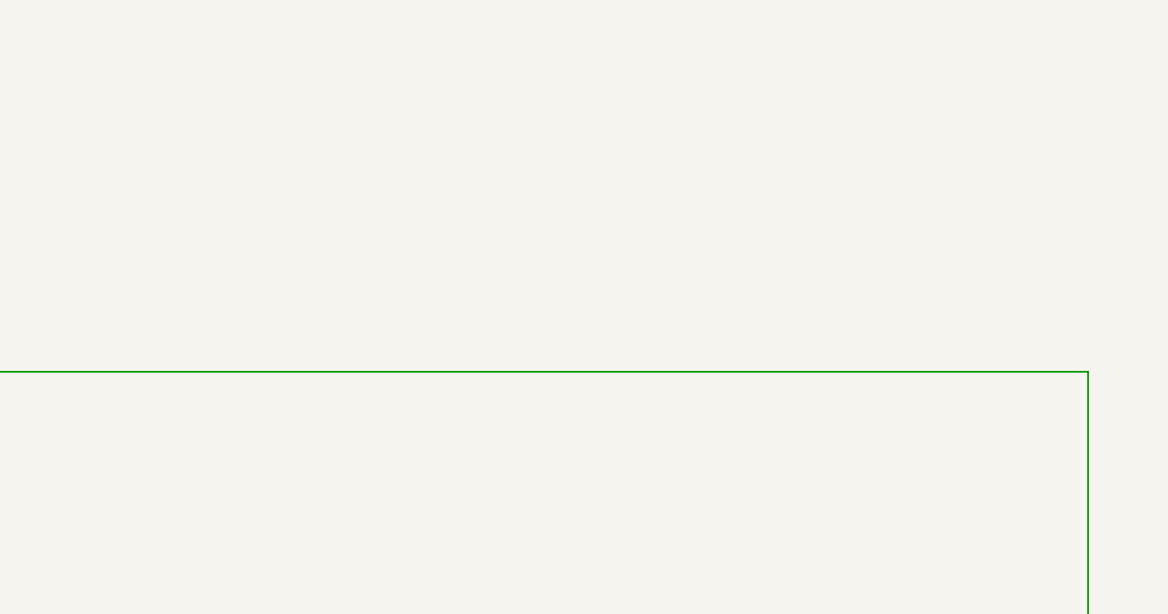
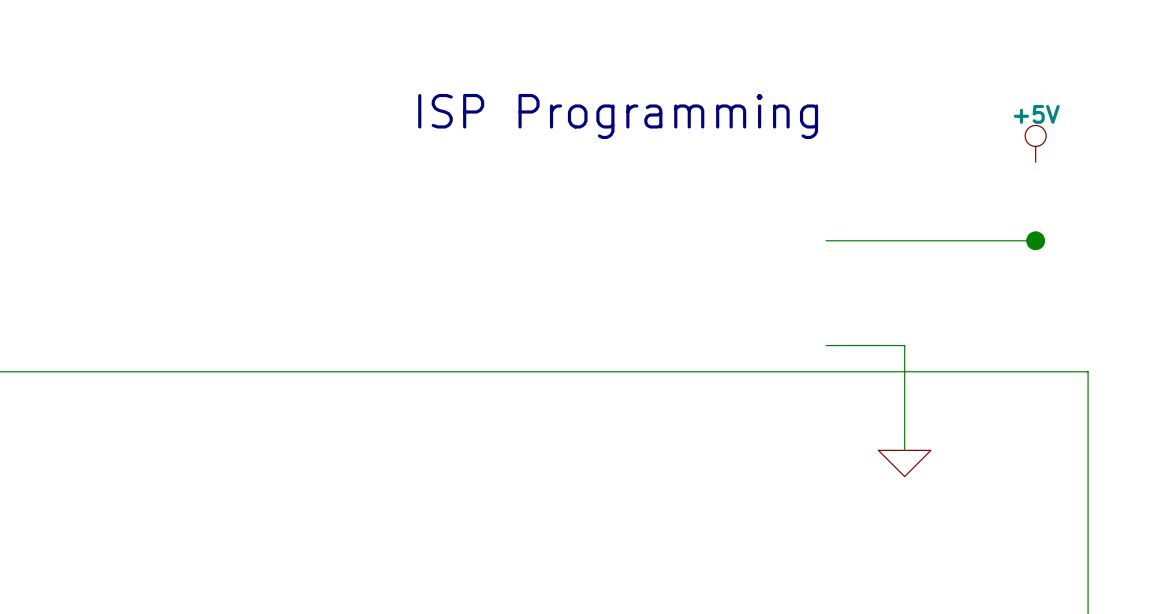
text: none -> ISP Programming (618, 116)
power symbol: none -> +5V (1035, 143)
wire: none -> (826, 240) (1035, 240)
junction: none -> (1035, 240)
wire: none -> (826, 345) (904, 345) (904, 450)
power symbol: none -> (904, 463)

